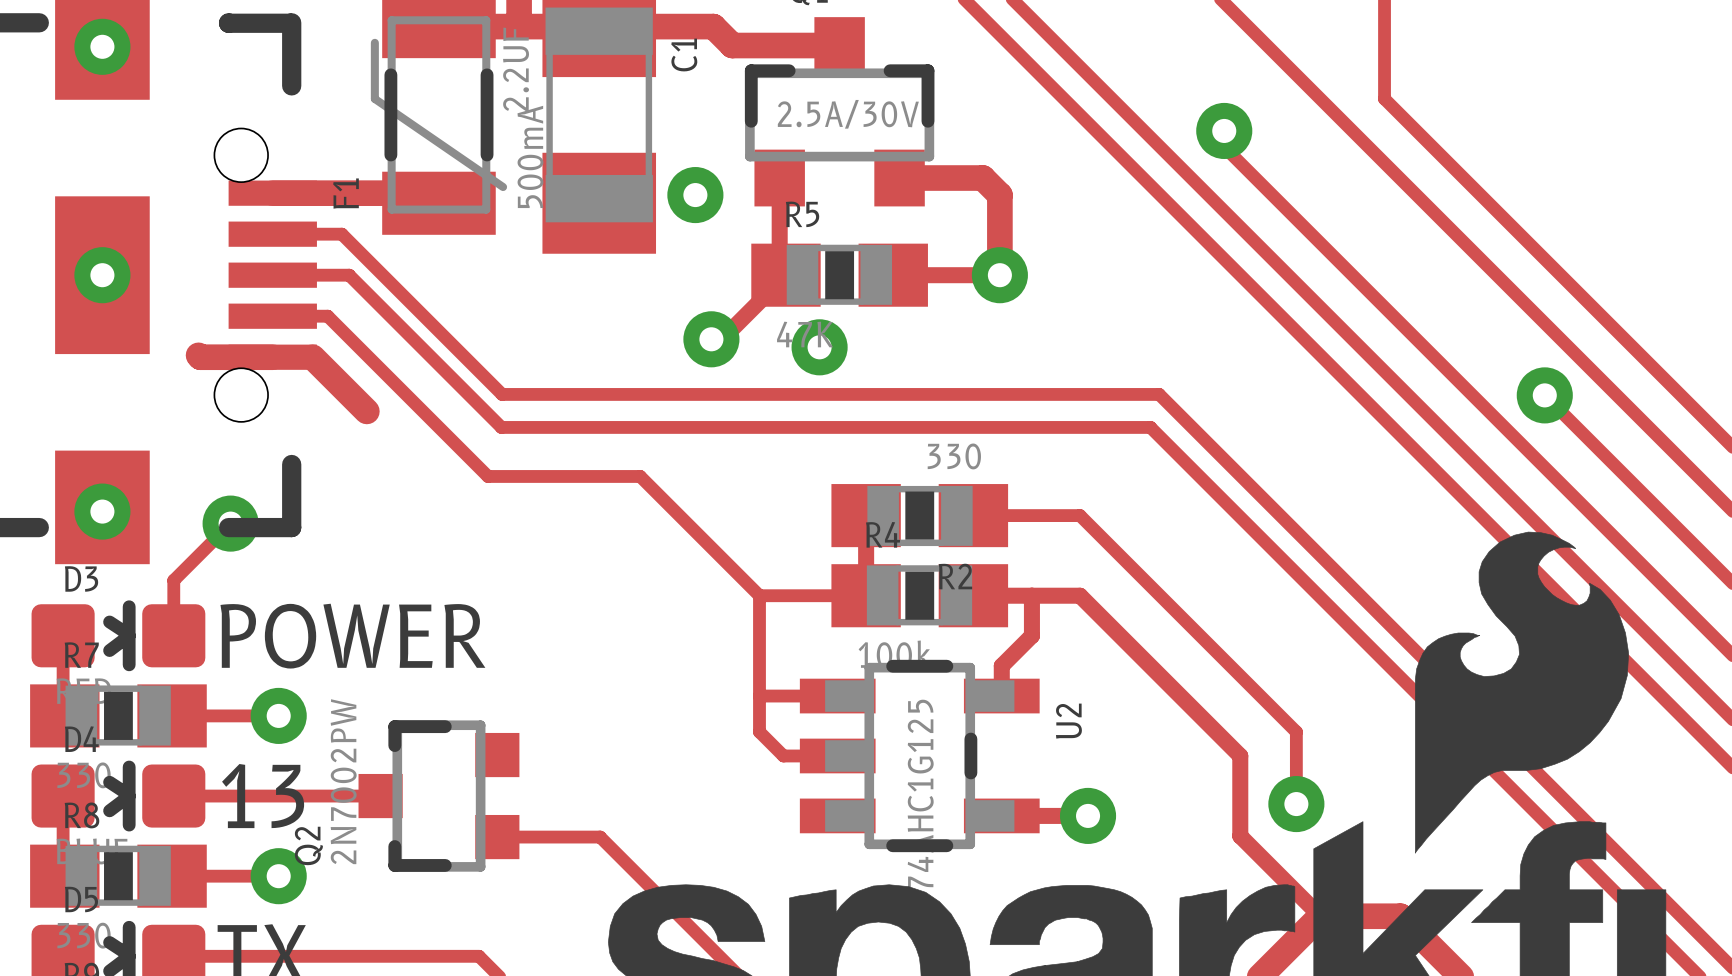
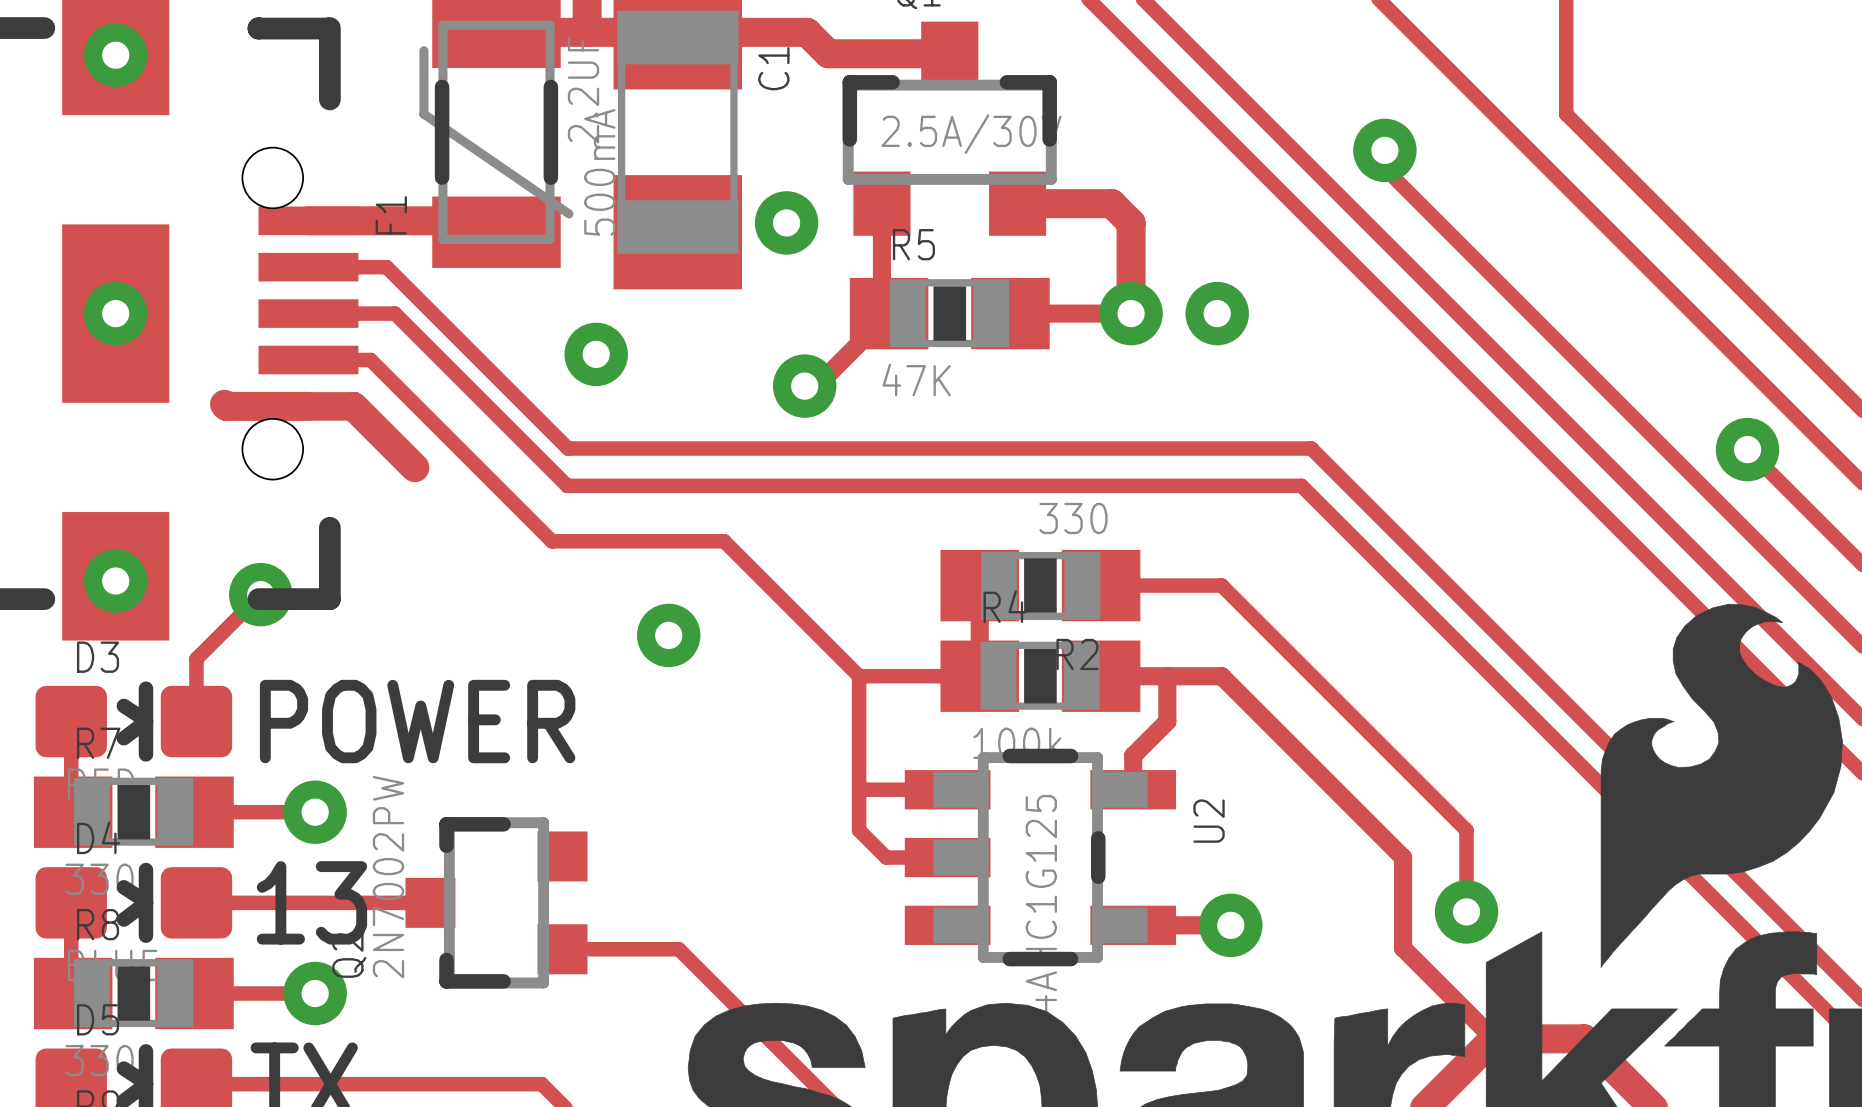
via: none -> (1217, 313)
via: none -> (596, 354)
via: (819, 347) -> none
via: none -> (668, 635)

